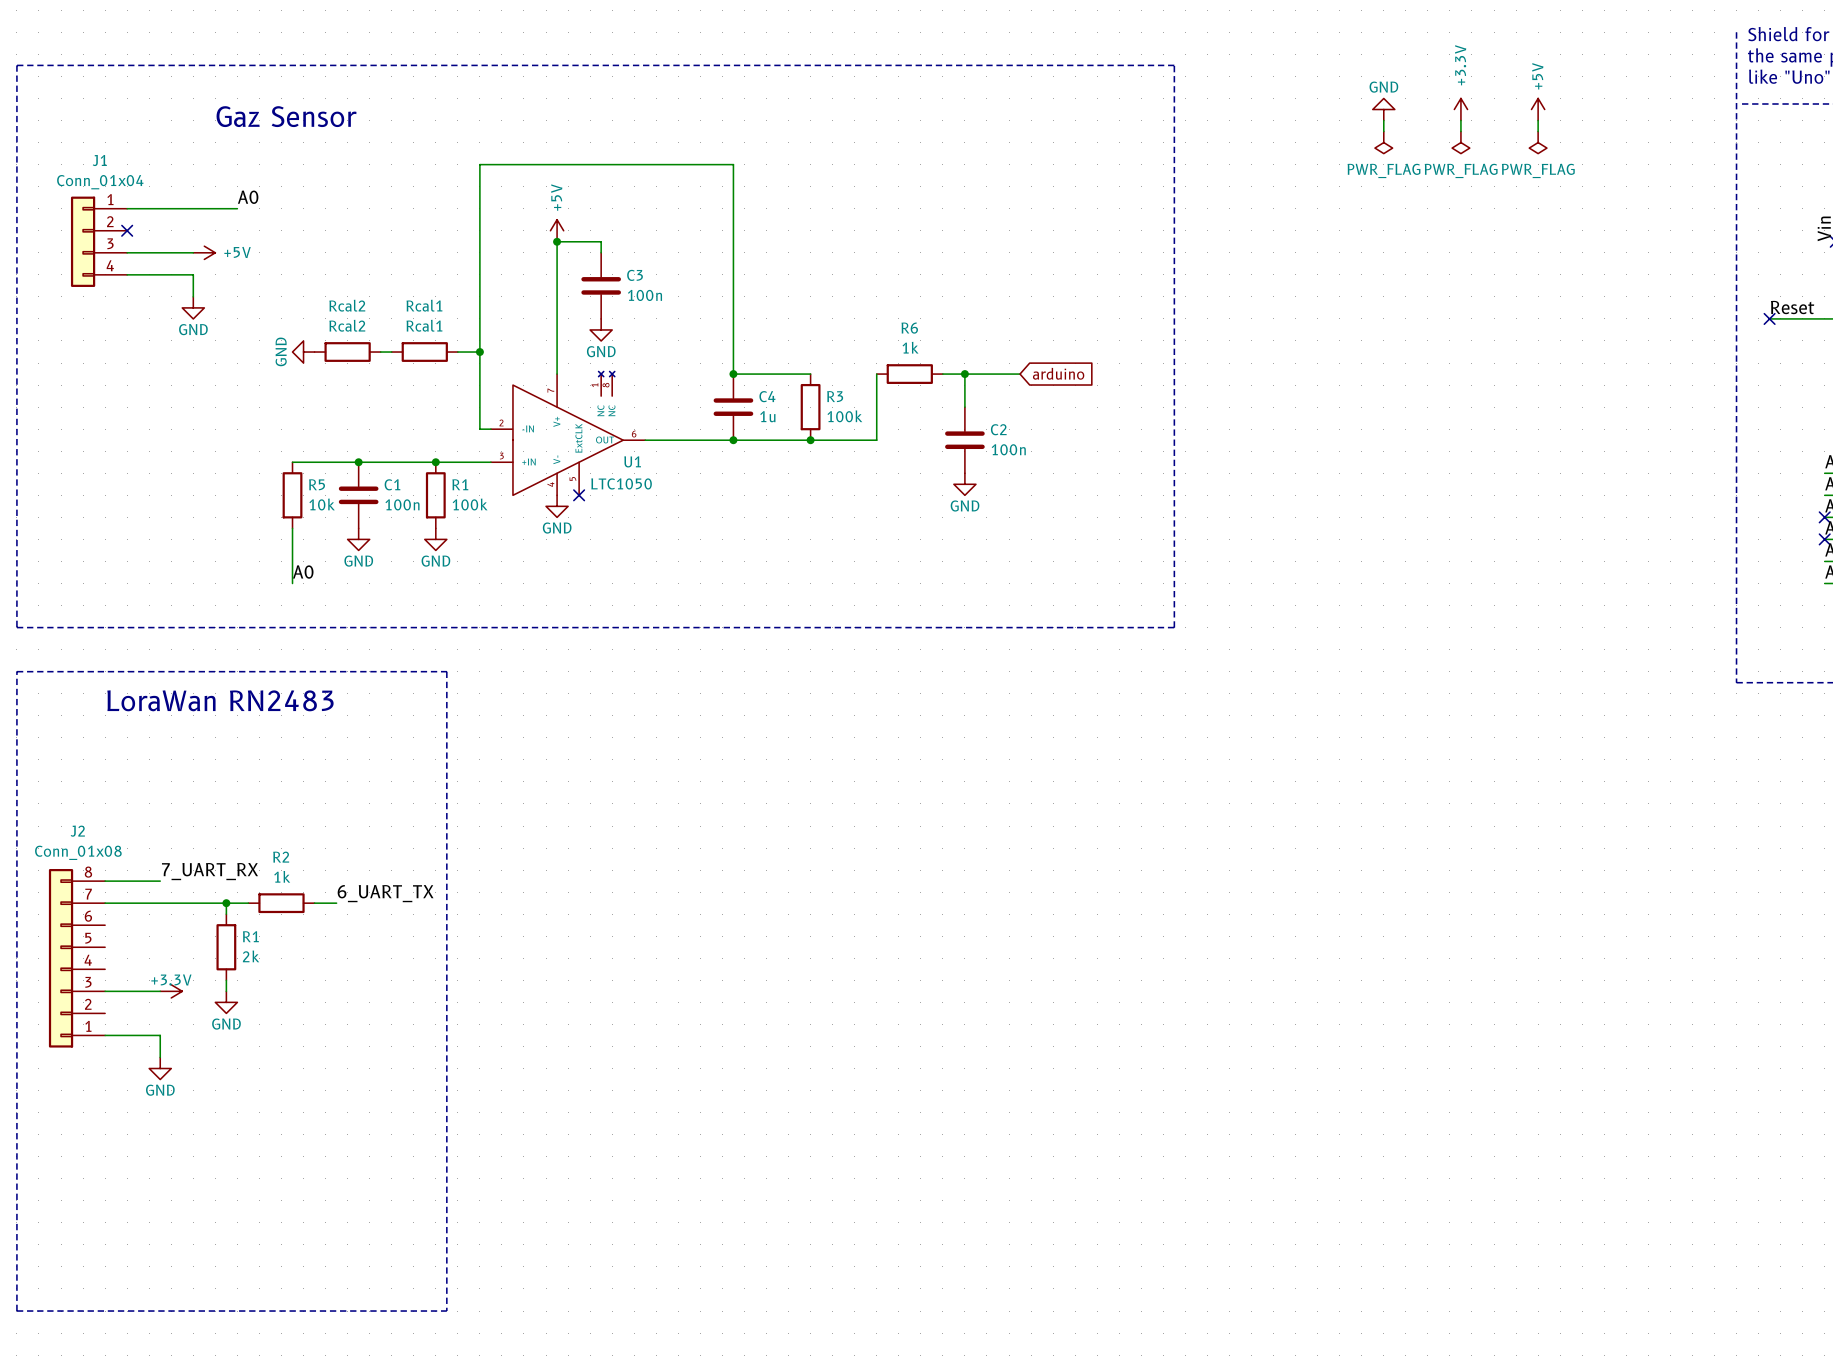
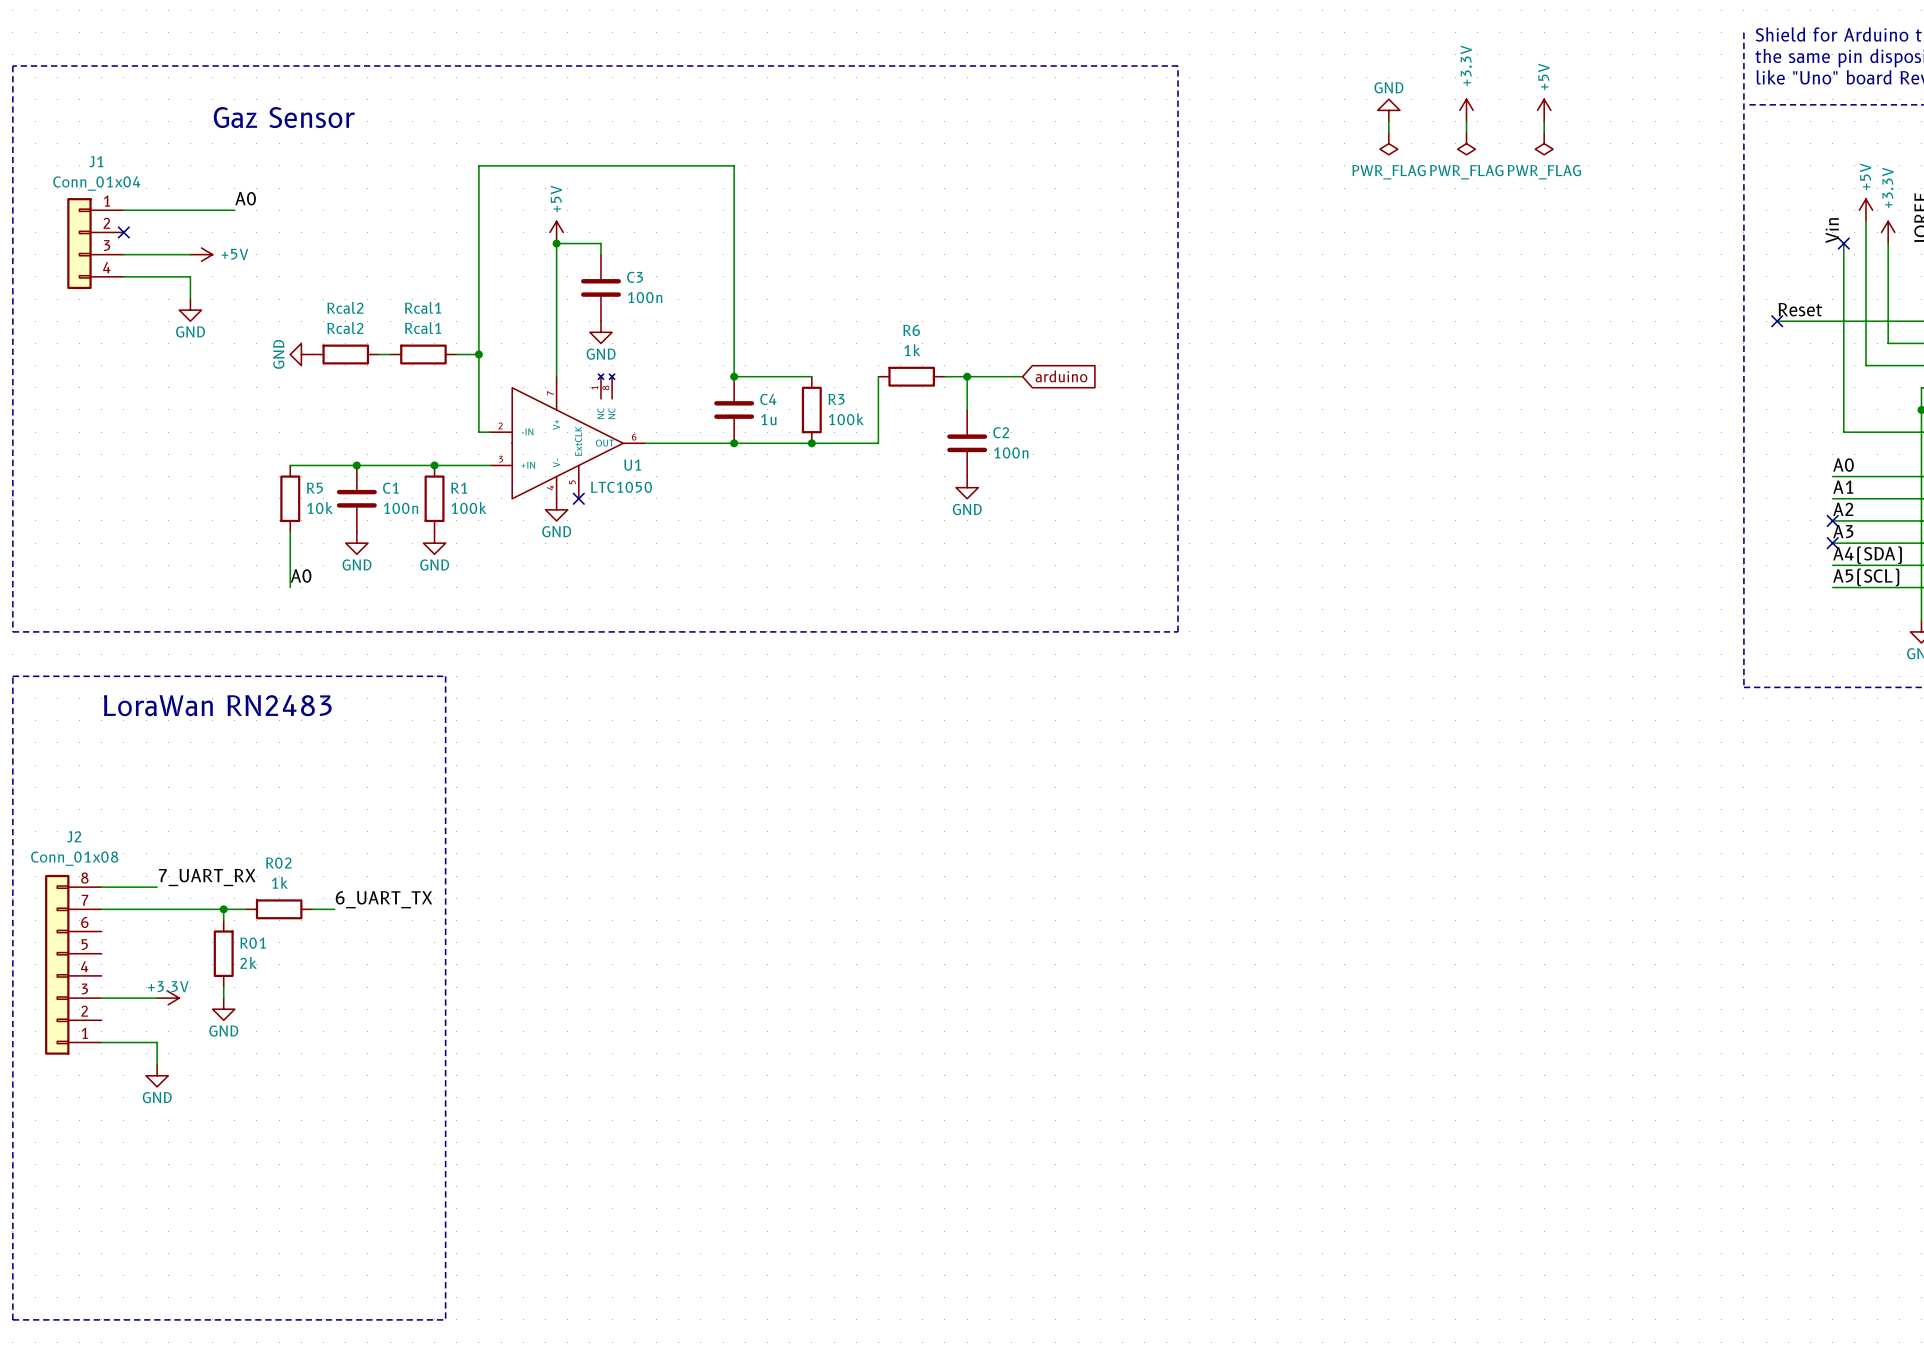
R2 name: R2 (281, 857) -> R02 (278, 863)
R1 name: R1 (250, 936) -> R01 (253, 943)

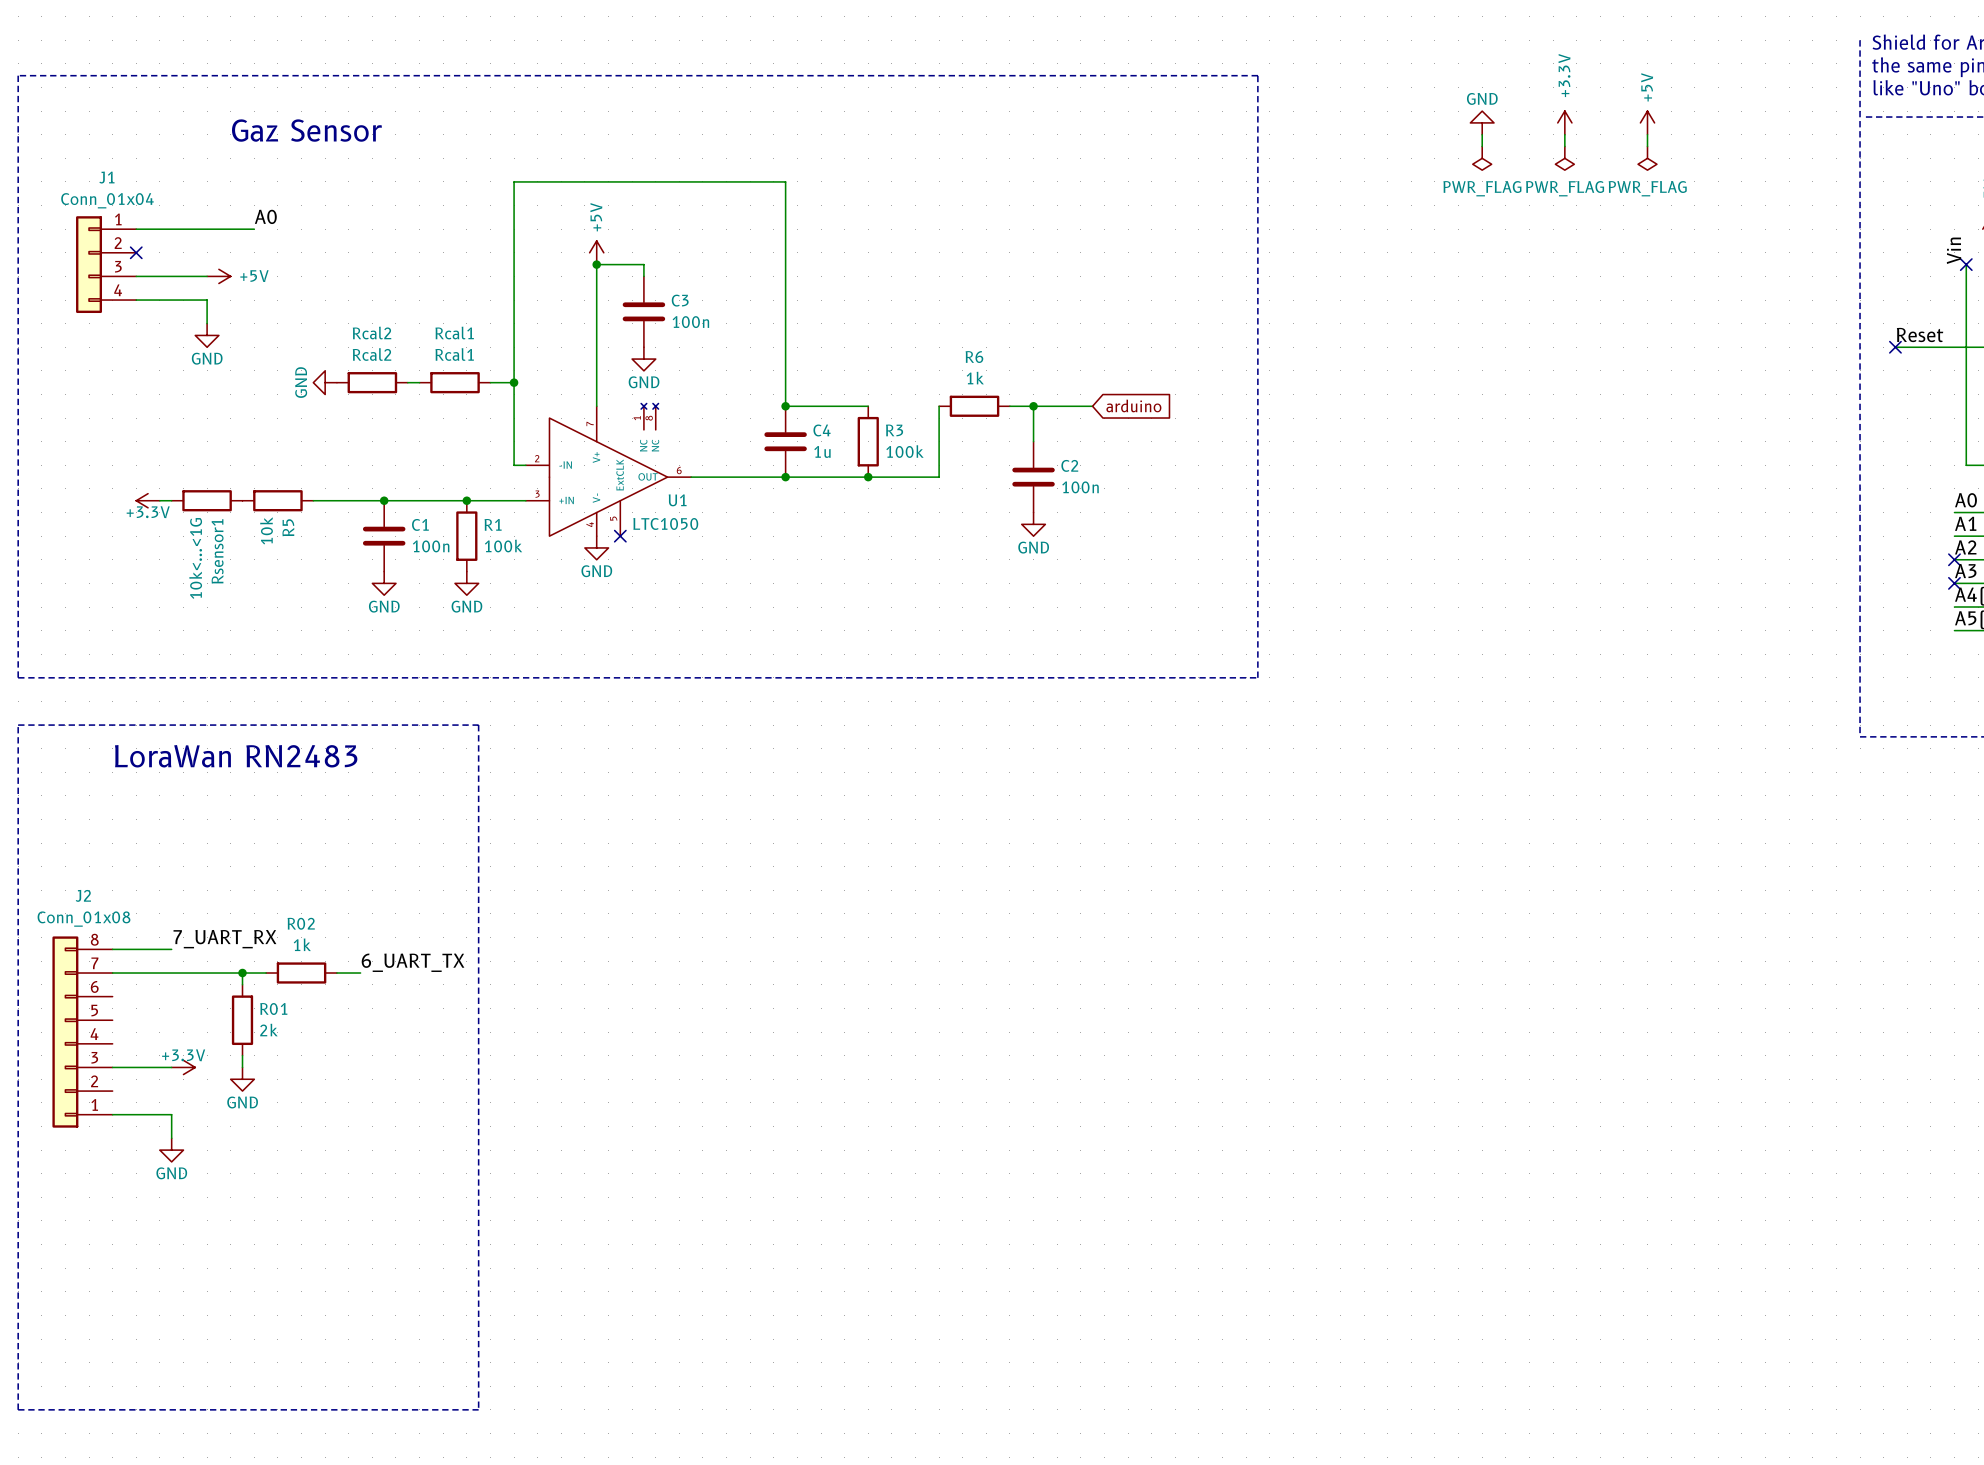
power symbol: none -> +3.3V (148, 500)
wire: none -> (159, 500) (171, 500)
Rsensor1: none -> 10k<...<1G (207, 500)
R5 rotation: 0° (290, 498) -> 90° clockwise (277, 500)
R5 position: (290, 498) -> (277, 500)
wire: (290, 532) (290, 587) -> none
label: A0 (301, 575) -> none

